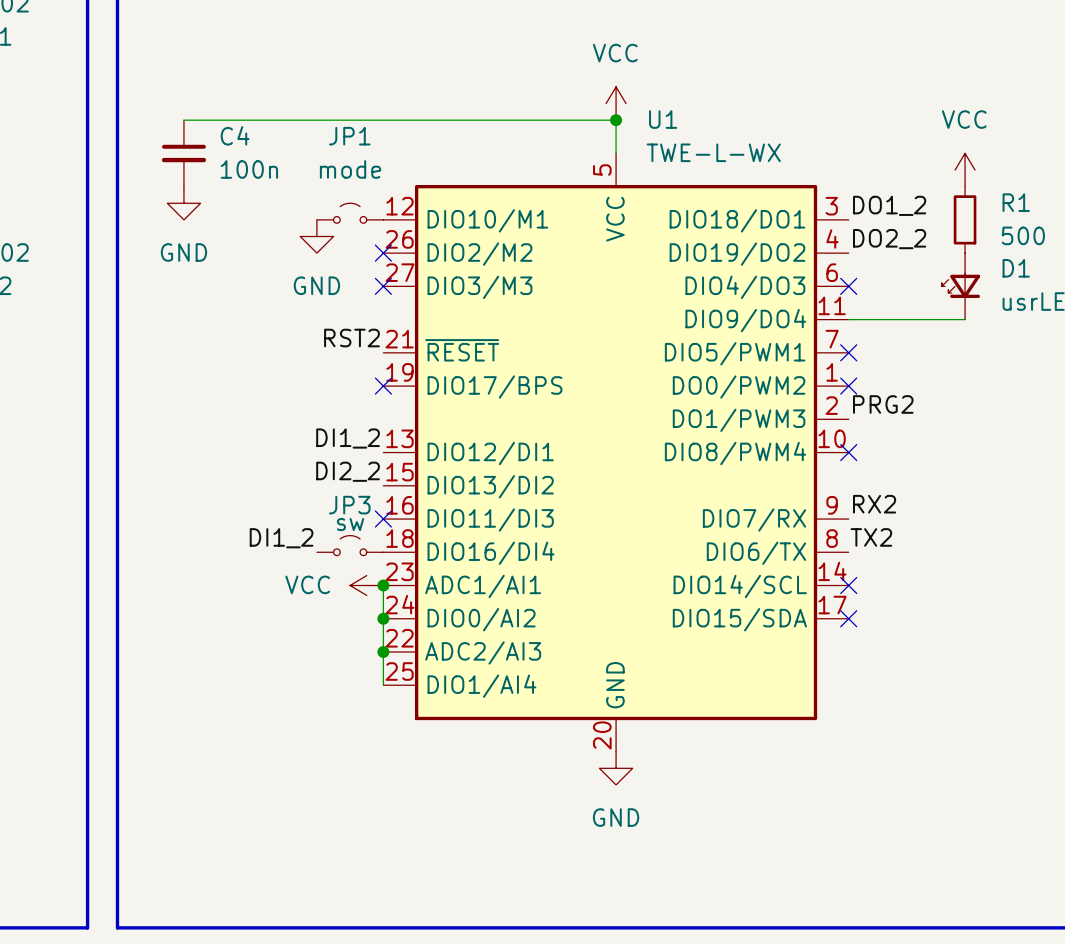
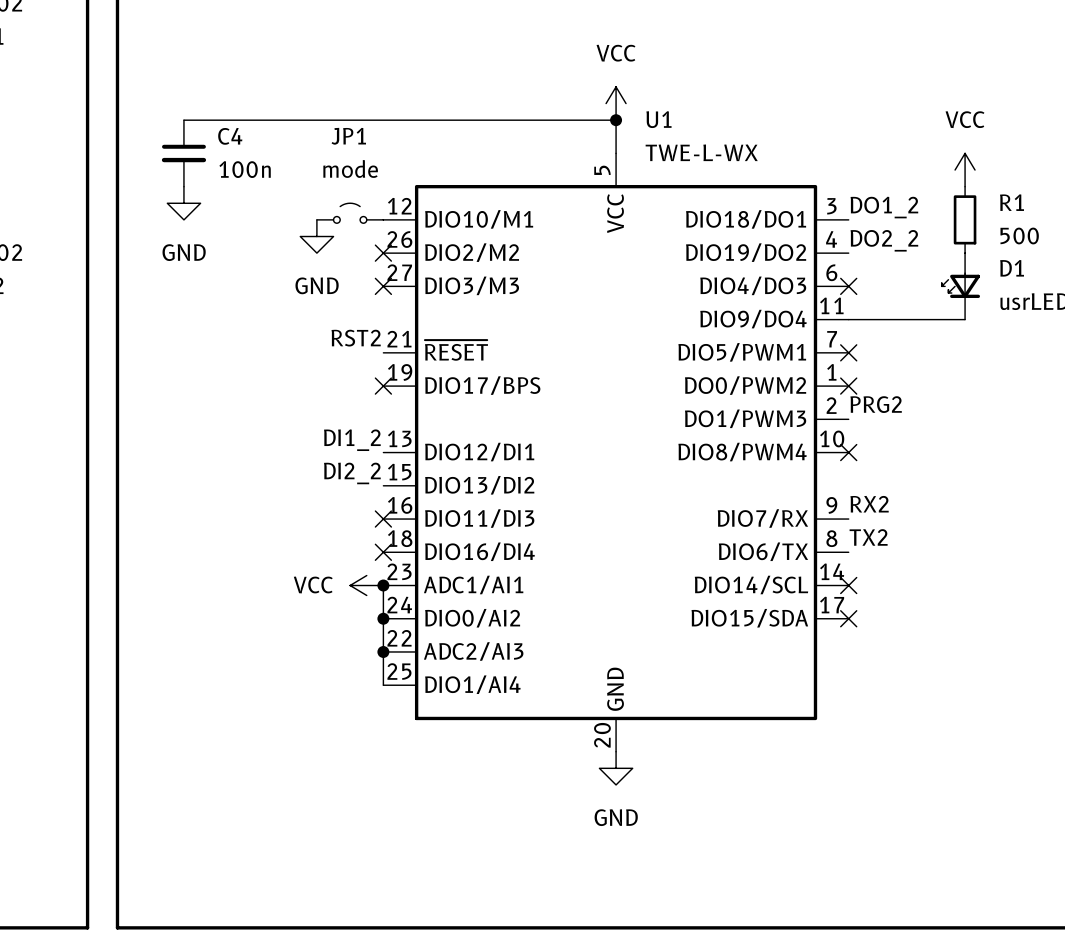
label: DI1_2 (281, 538) -> none
JP3: sw (350, 545) -> none
no-connect mark: none -> (383, 552)

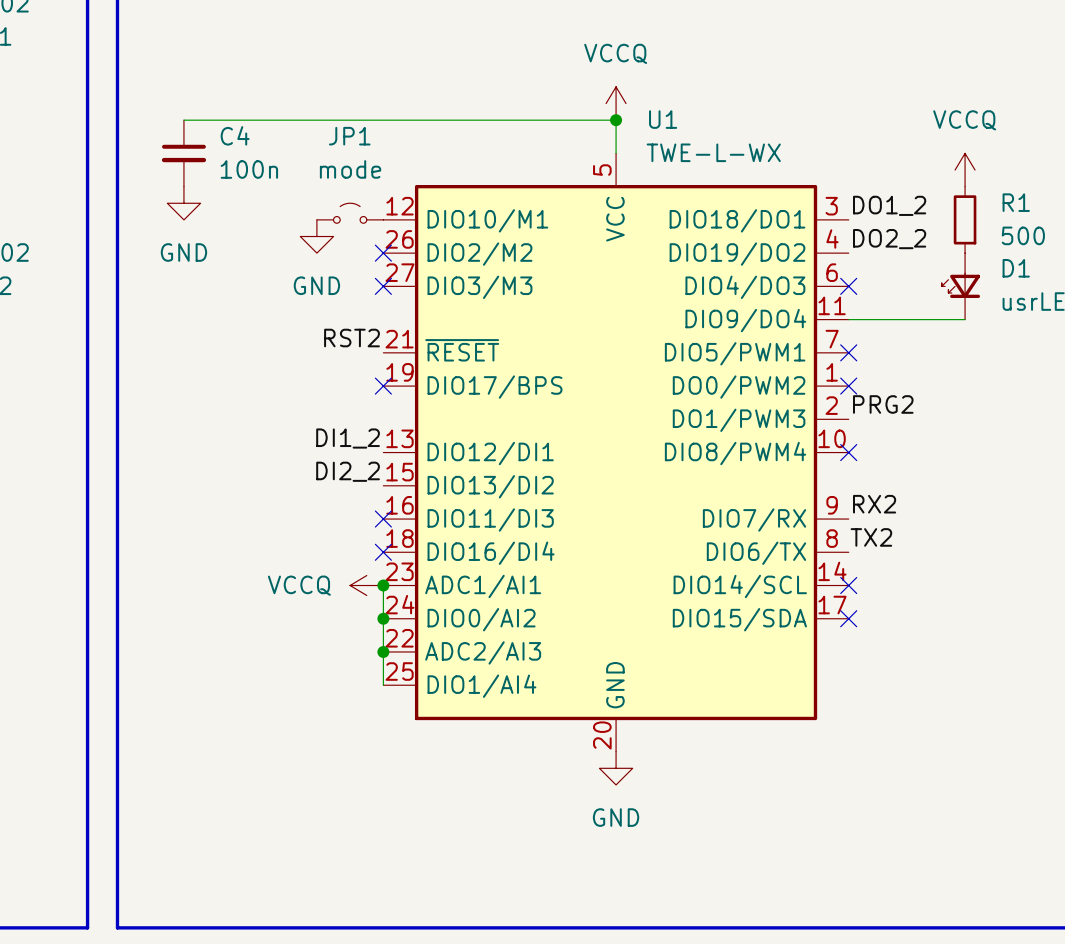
power symbol: VCC (616, 103) -> VCCQ (616, 103)
power symbol: VCC (965, 170) -> VCCQ (965, 170)
power symbol: VCC (366, 585) -> VCCQ (366, 585)

